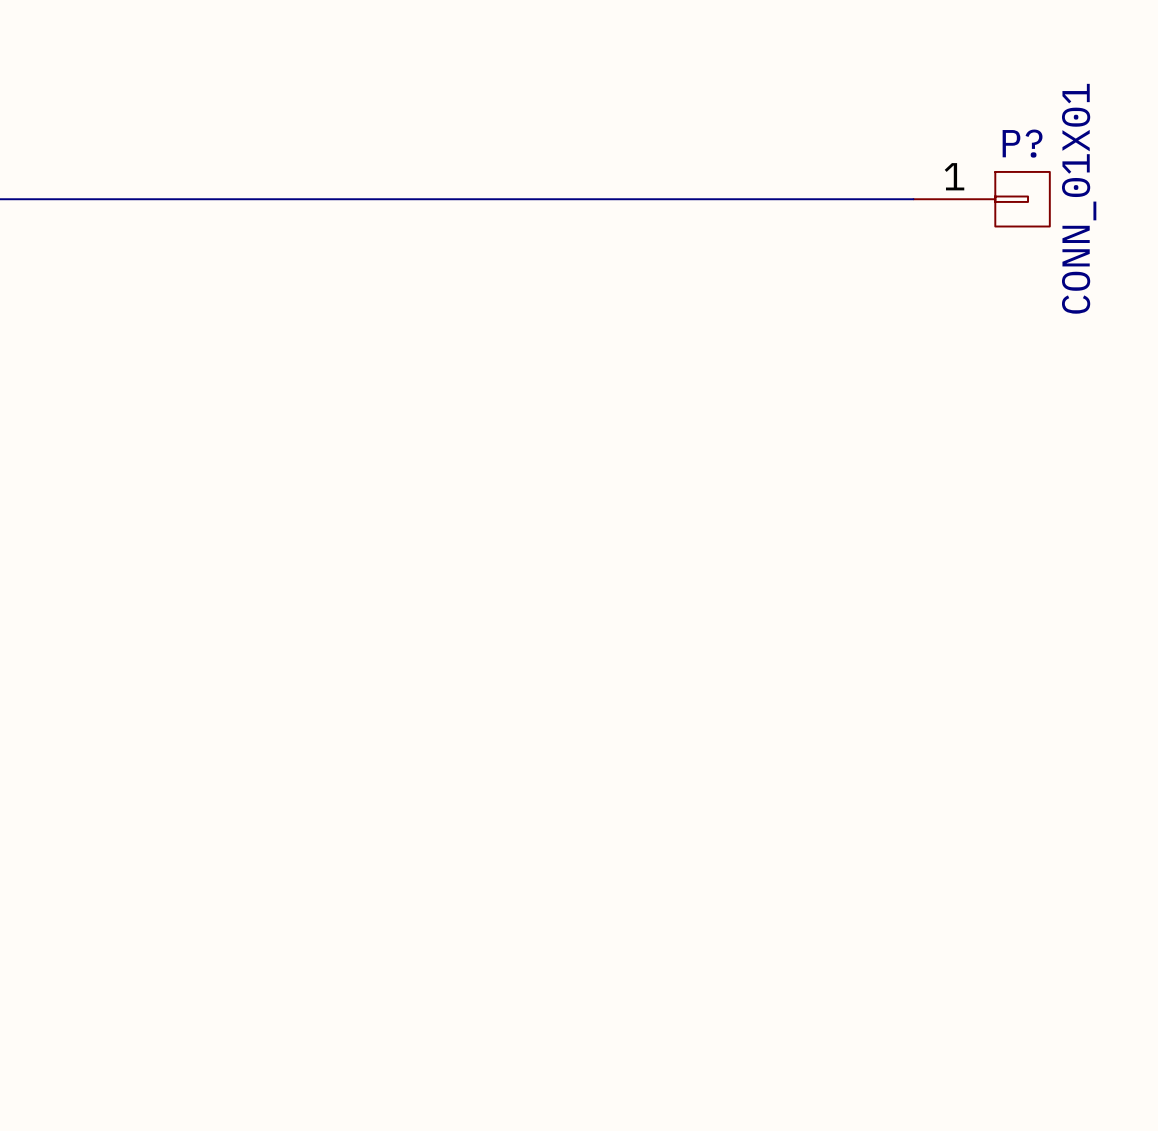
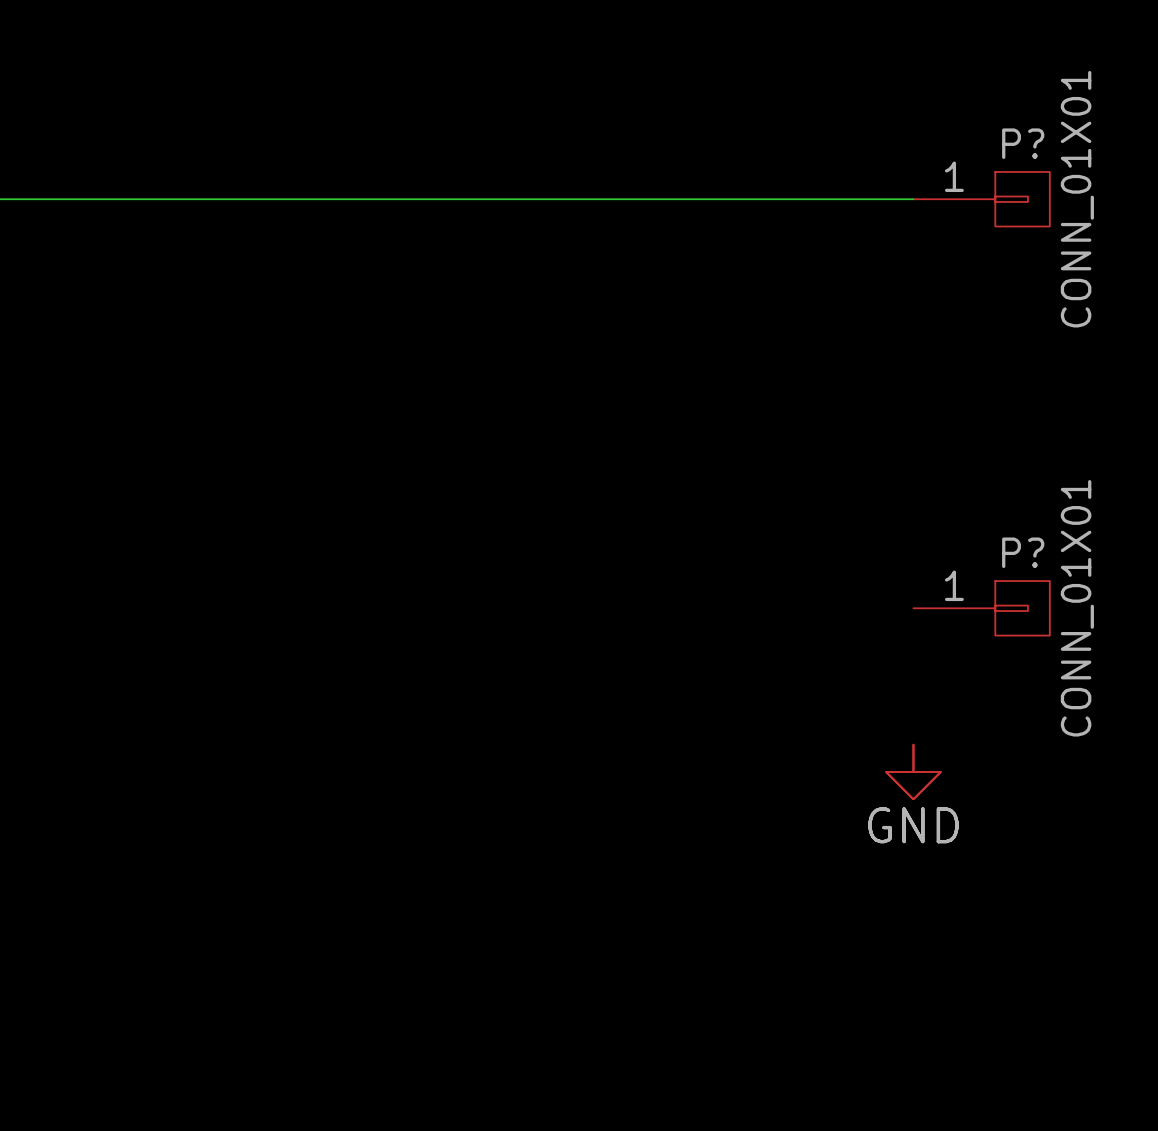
P?: none -> CONN_01X01 (981, 608)
power symbol: none -> GND (913, 771)

